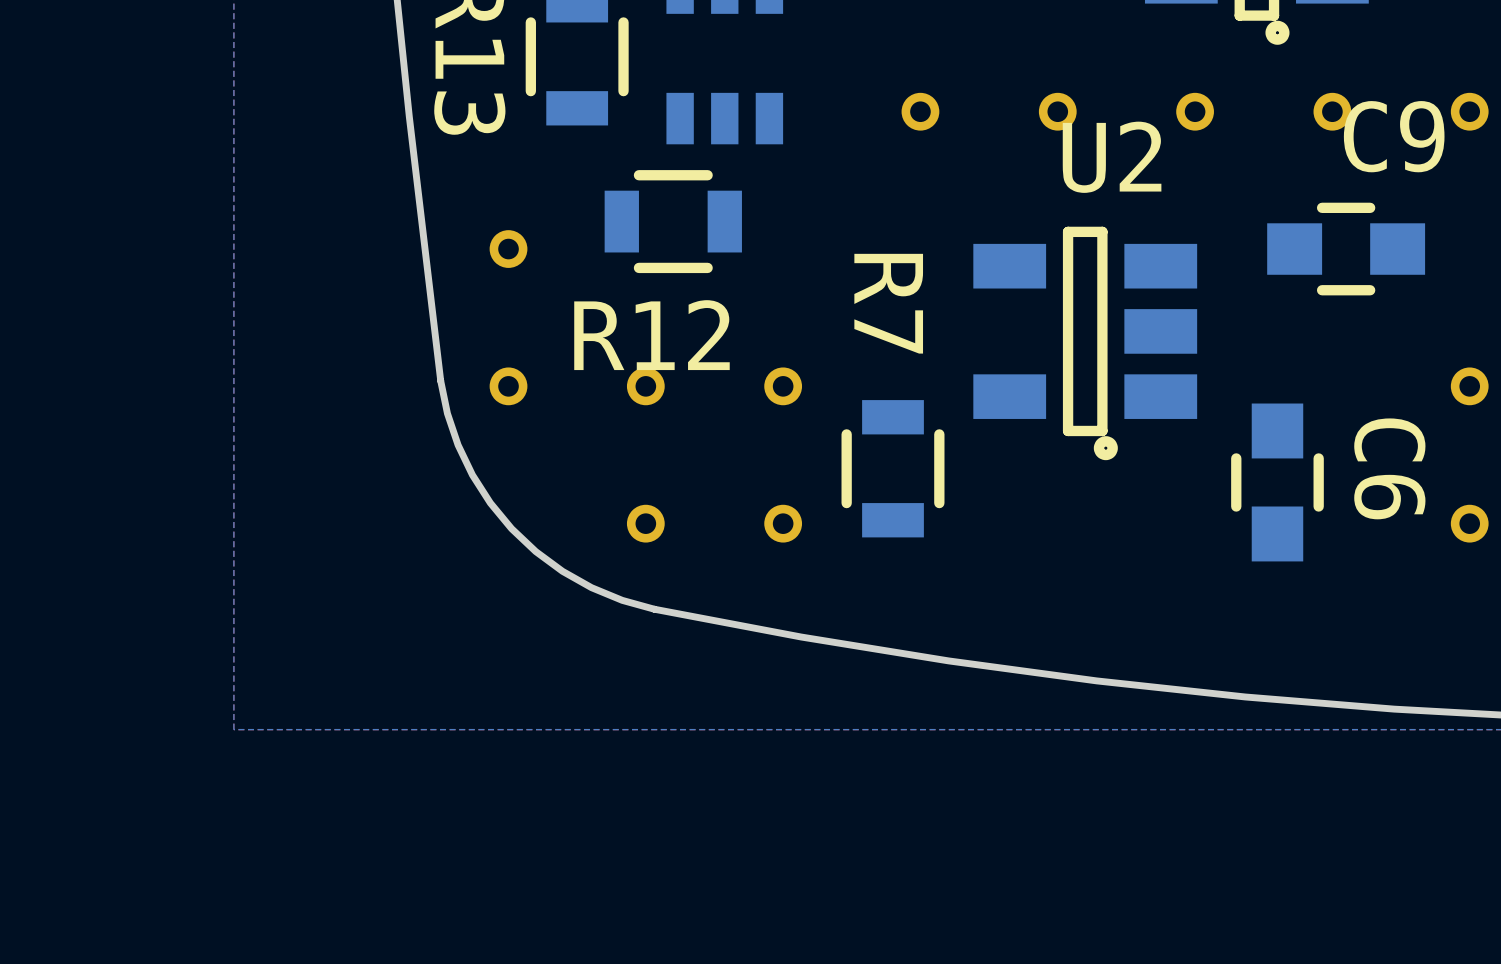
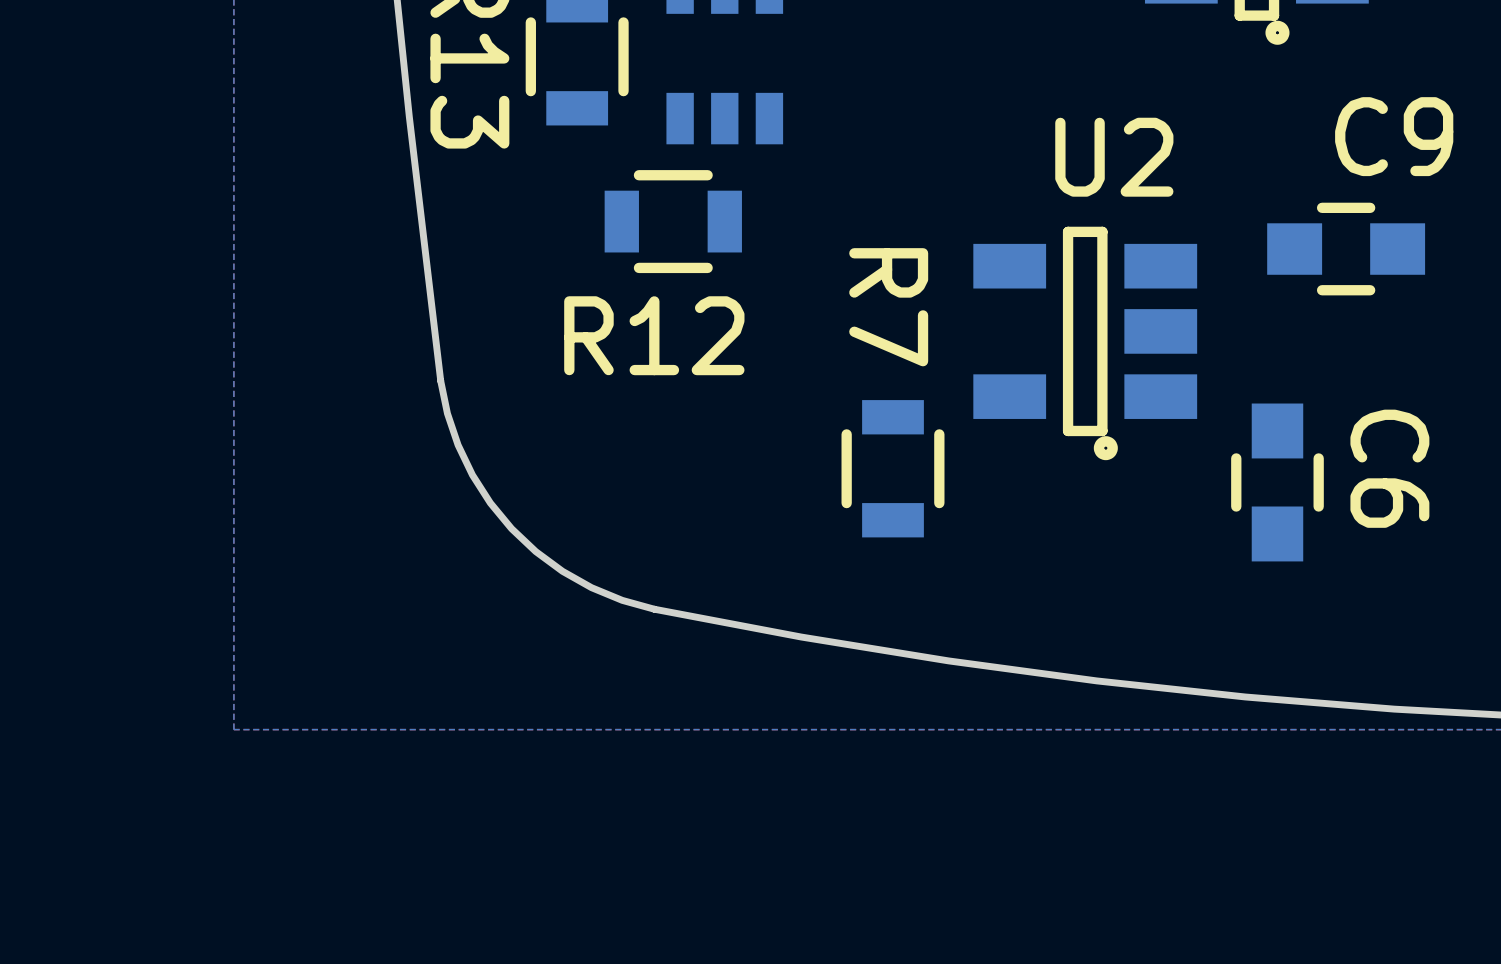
part: (920, 111) -> none
part: (1057, 111) -> none
part: (1195, 111) -> none
part: (1332, 111) -> none
part: (1469, 111) -> none
part: (508, 249) -> none
part: (508, 386) -> none
part: (645, 386) -> none
part: (783, 386) -> none
part: (1469, 386) -> none
part: (645, 523) -> none
part: (783, 523) -> none
part: (1469, 523) -> none

